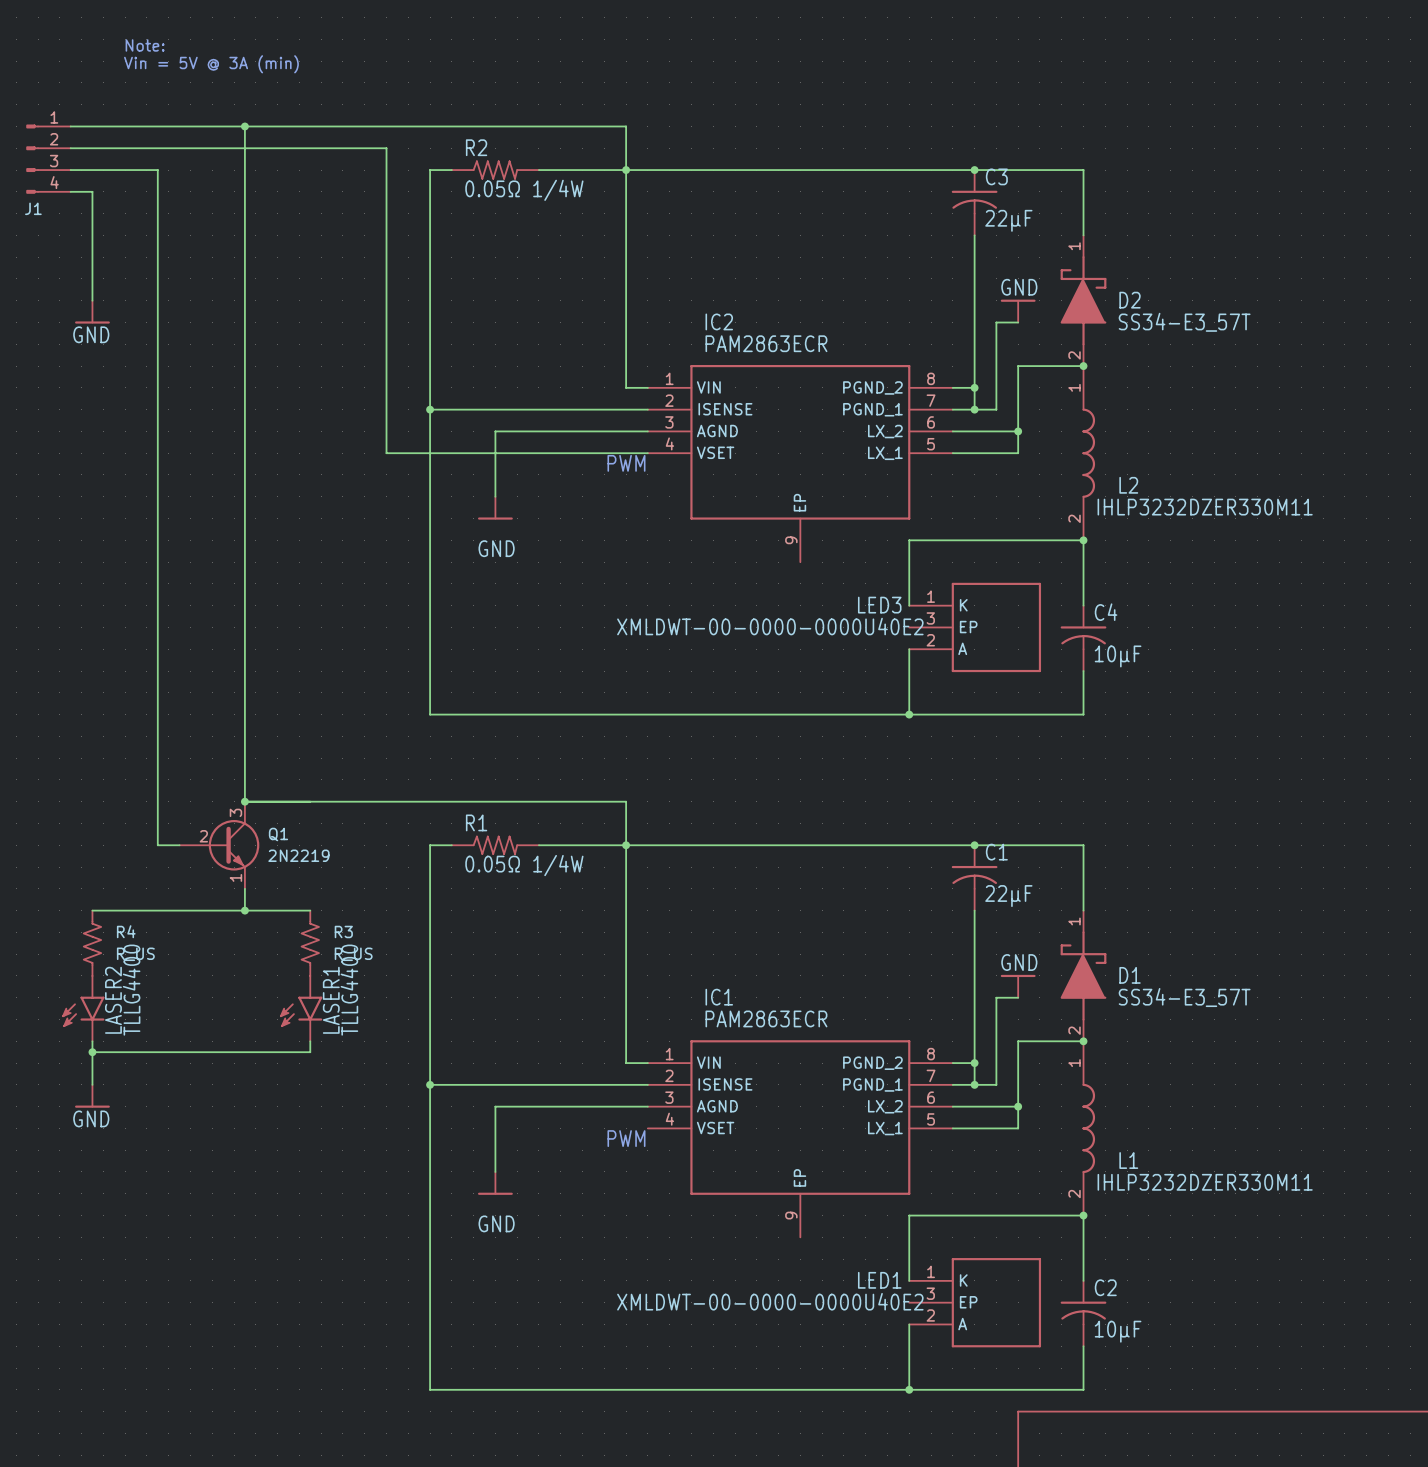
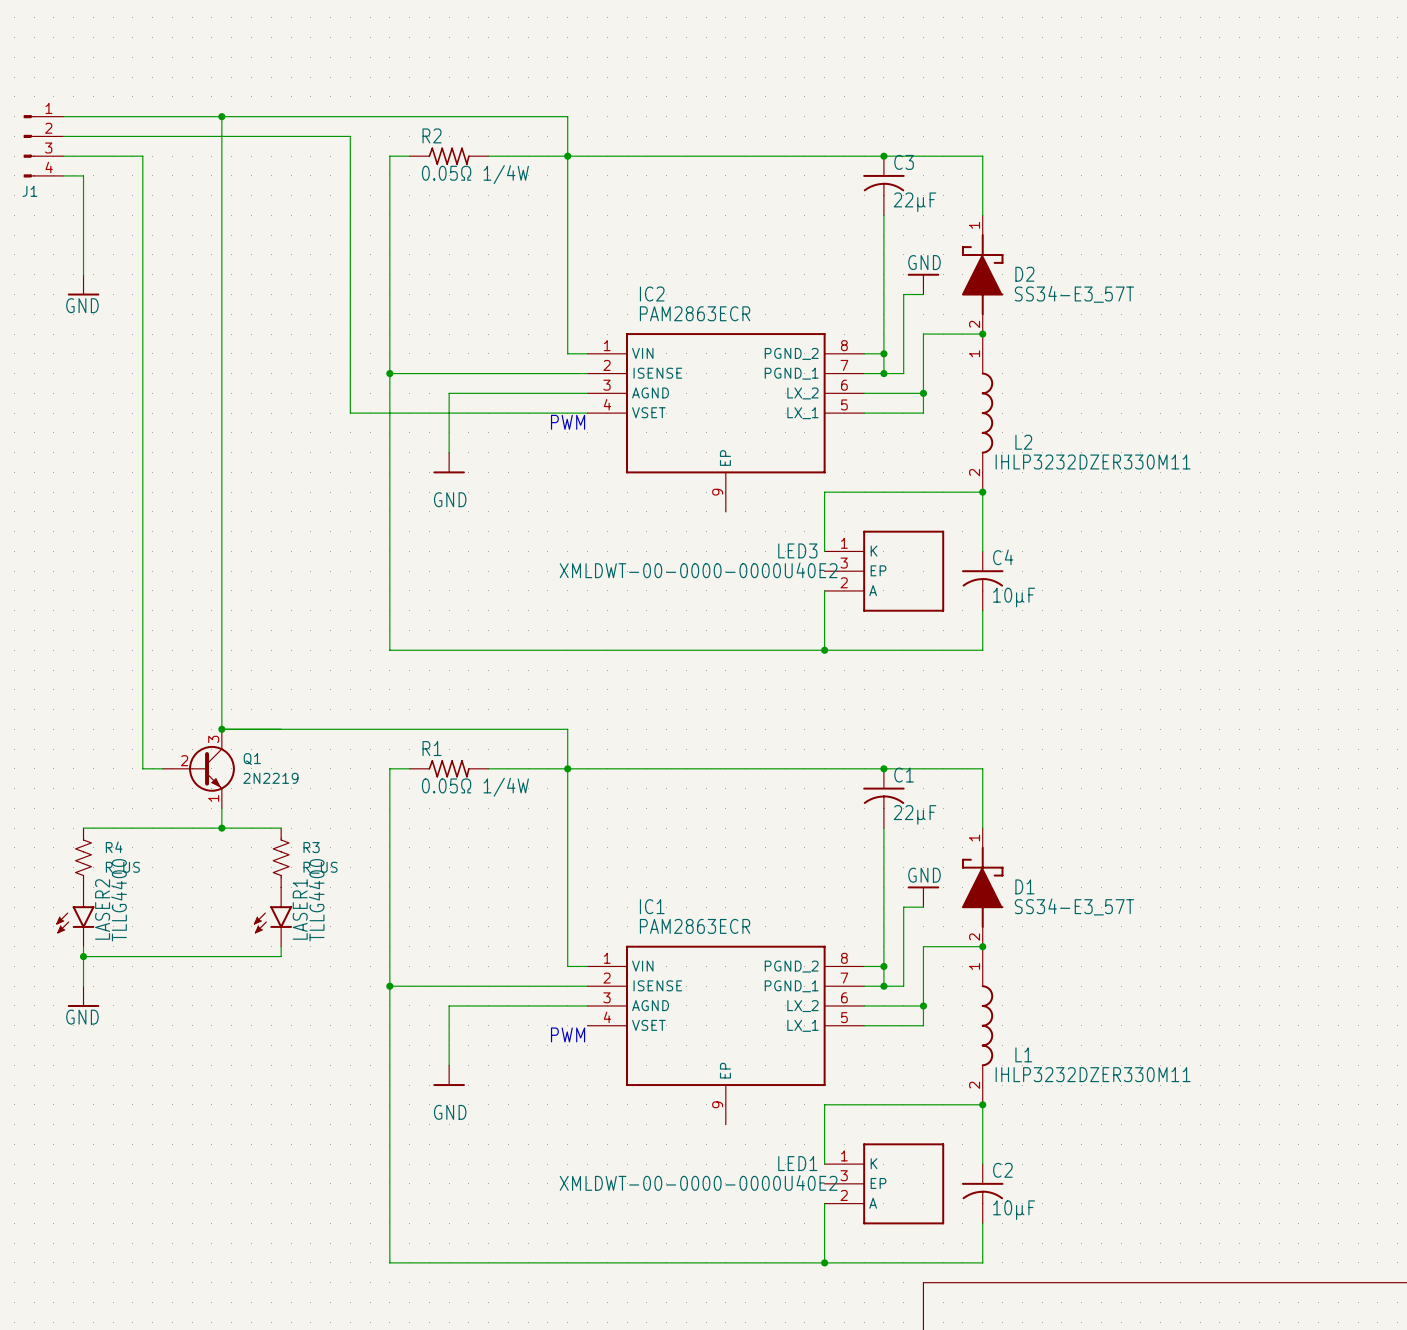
text: Note: (145, 45) -> none
text: Vin = 5V @ 3A (min) (211, 64) -> none

